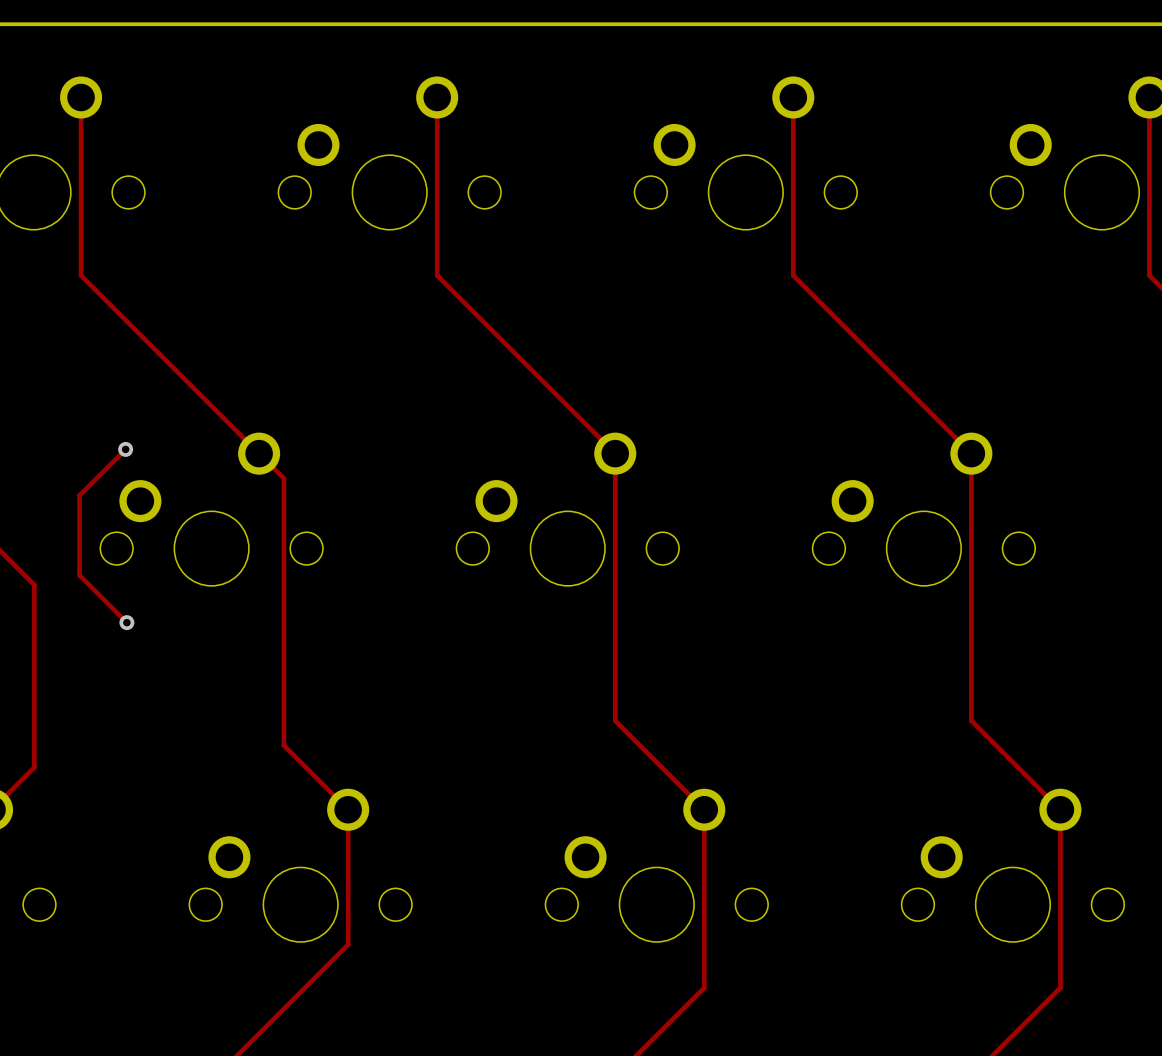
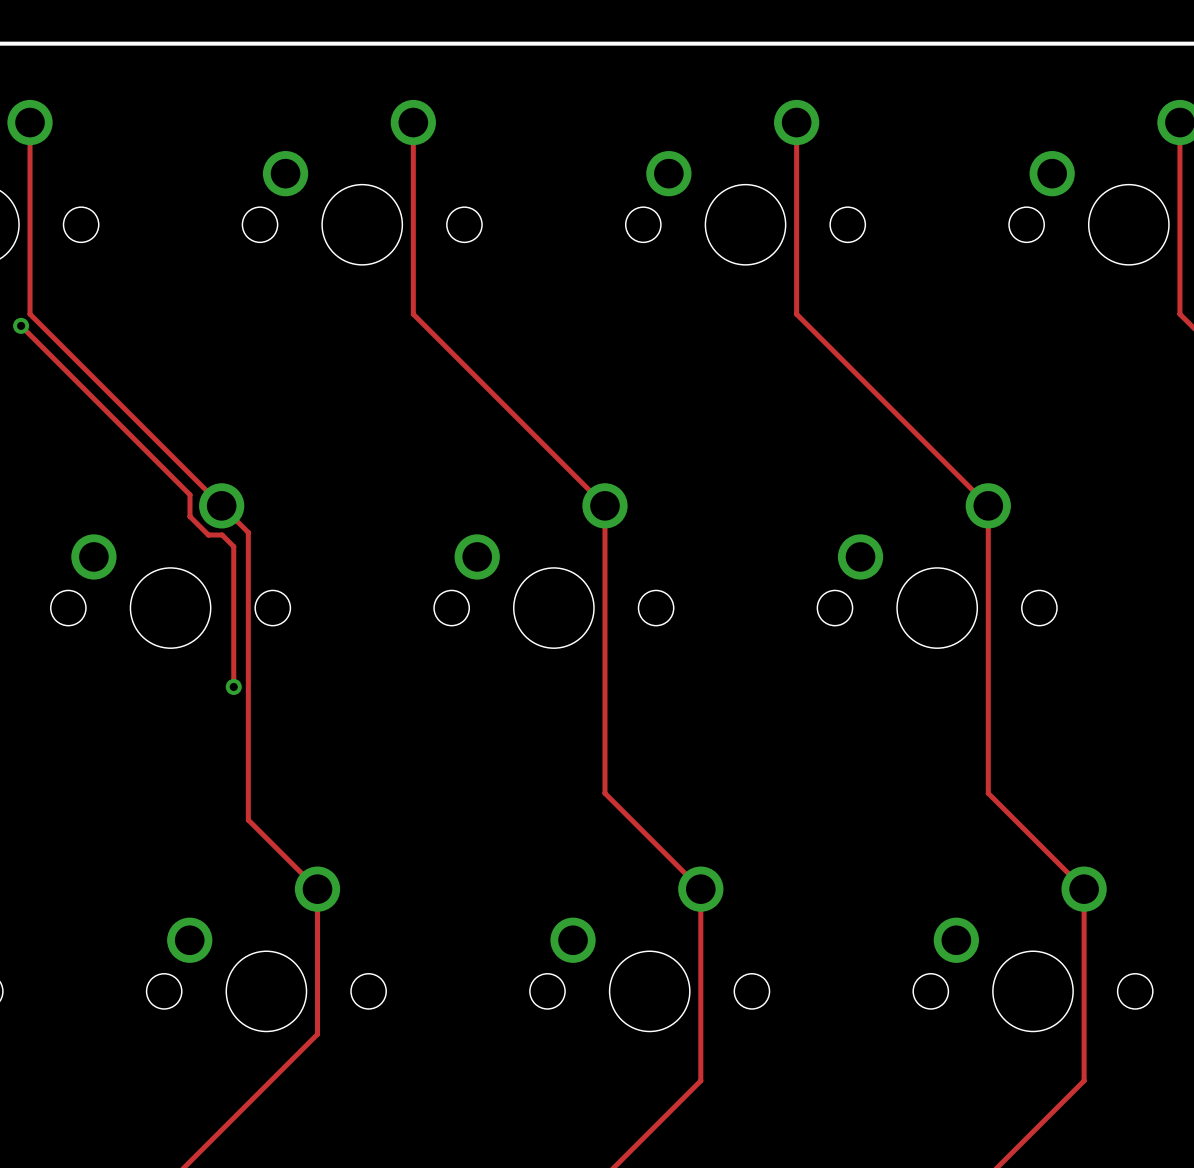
track: none -> (21, 325) (189, 494) (189, 516) (208, 535) (222, 535) (233, 546) (233, 686)
via: none -> (21, 325)
track: (125, 449) (79, 495) (79, 575) (126, 622) -> none
via: (125, 449) -> none
via: none -> (233, 686)
via: (126, 622) -> none

